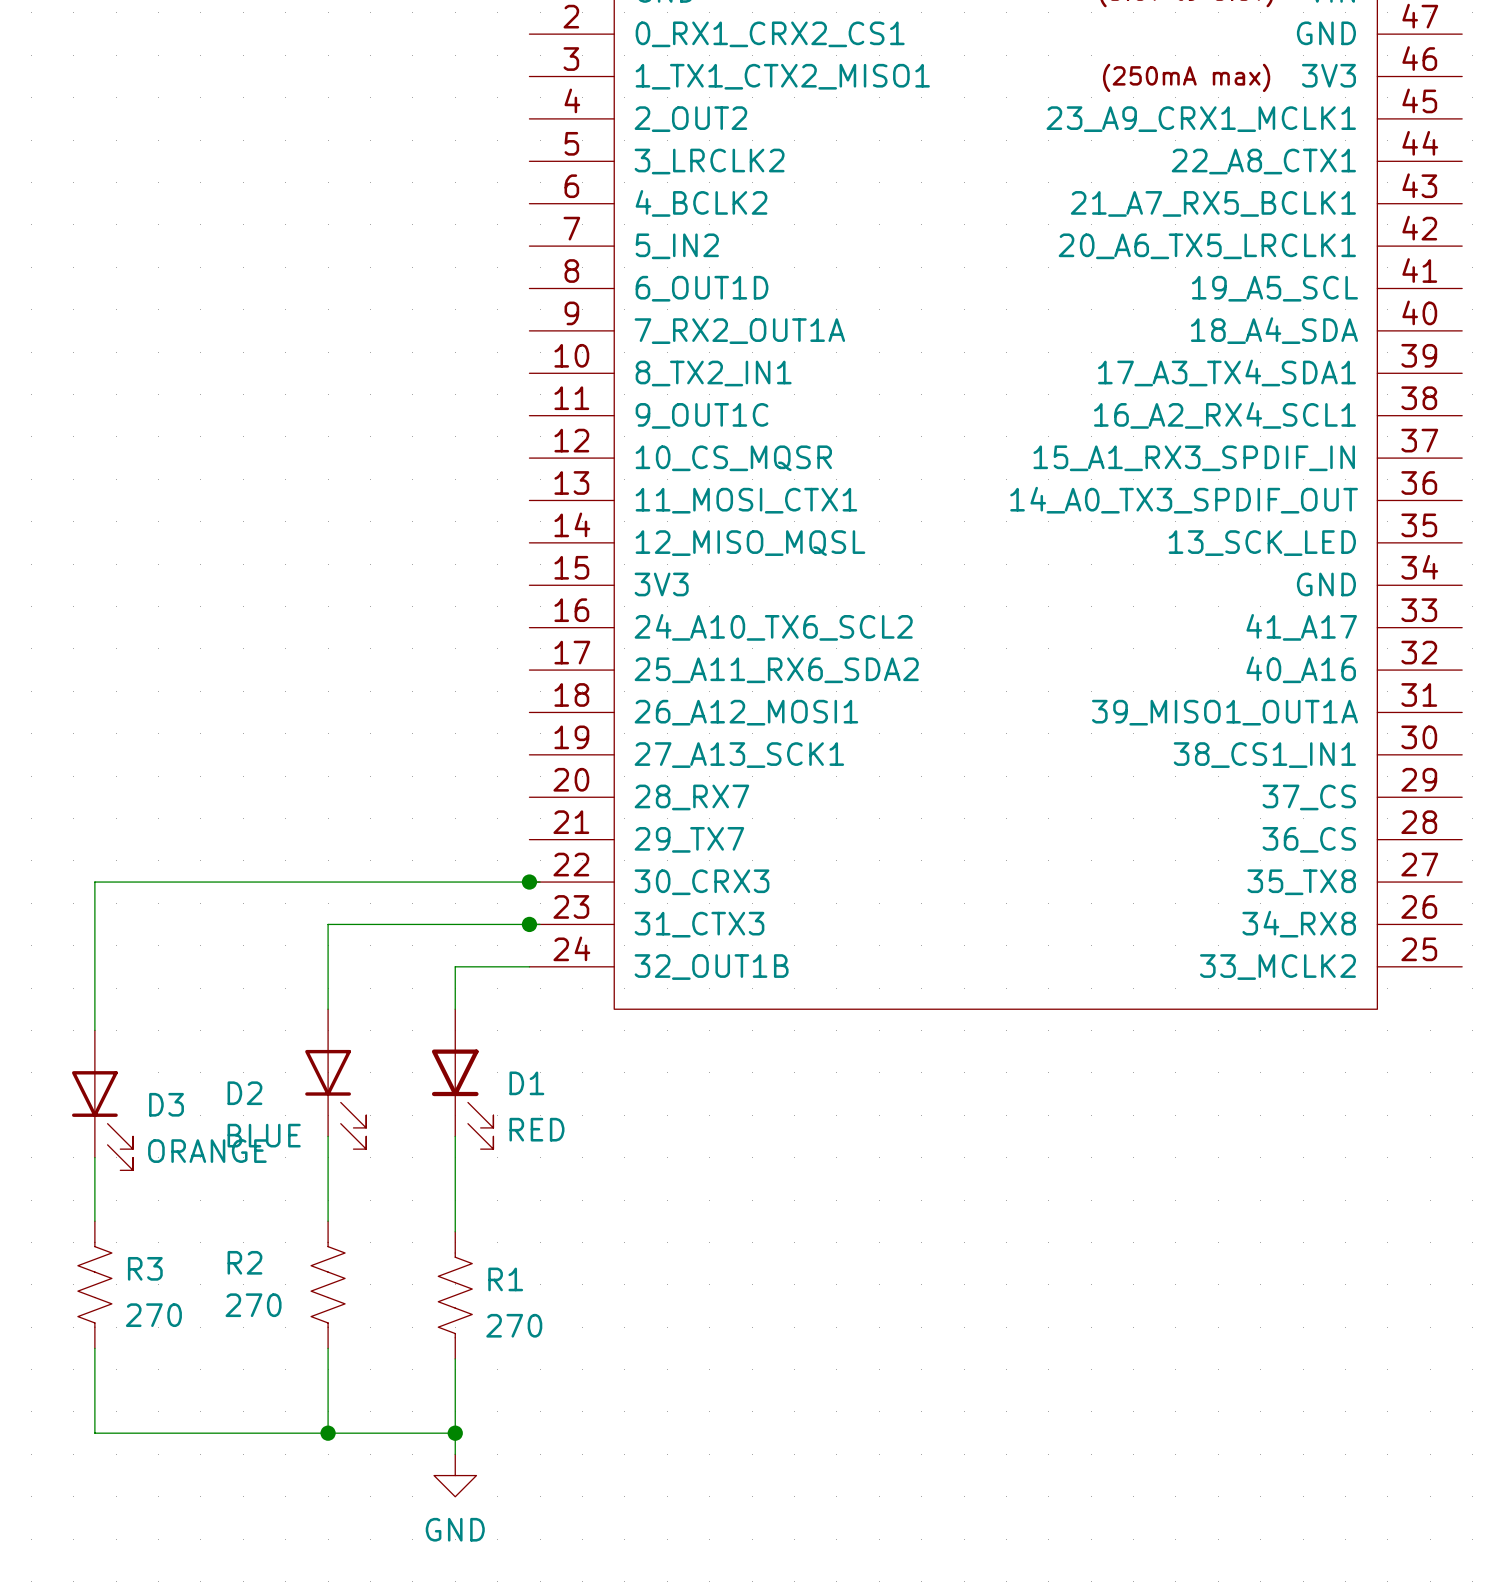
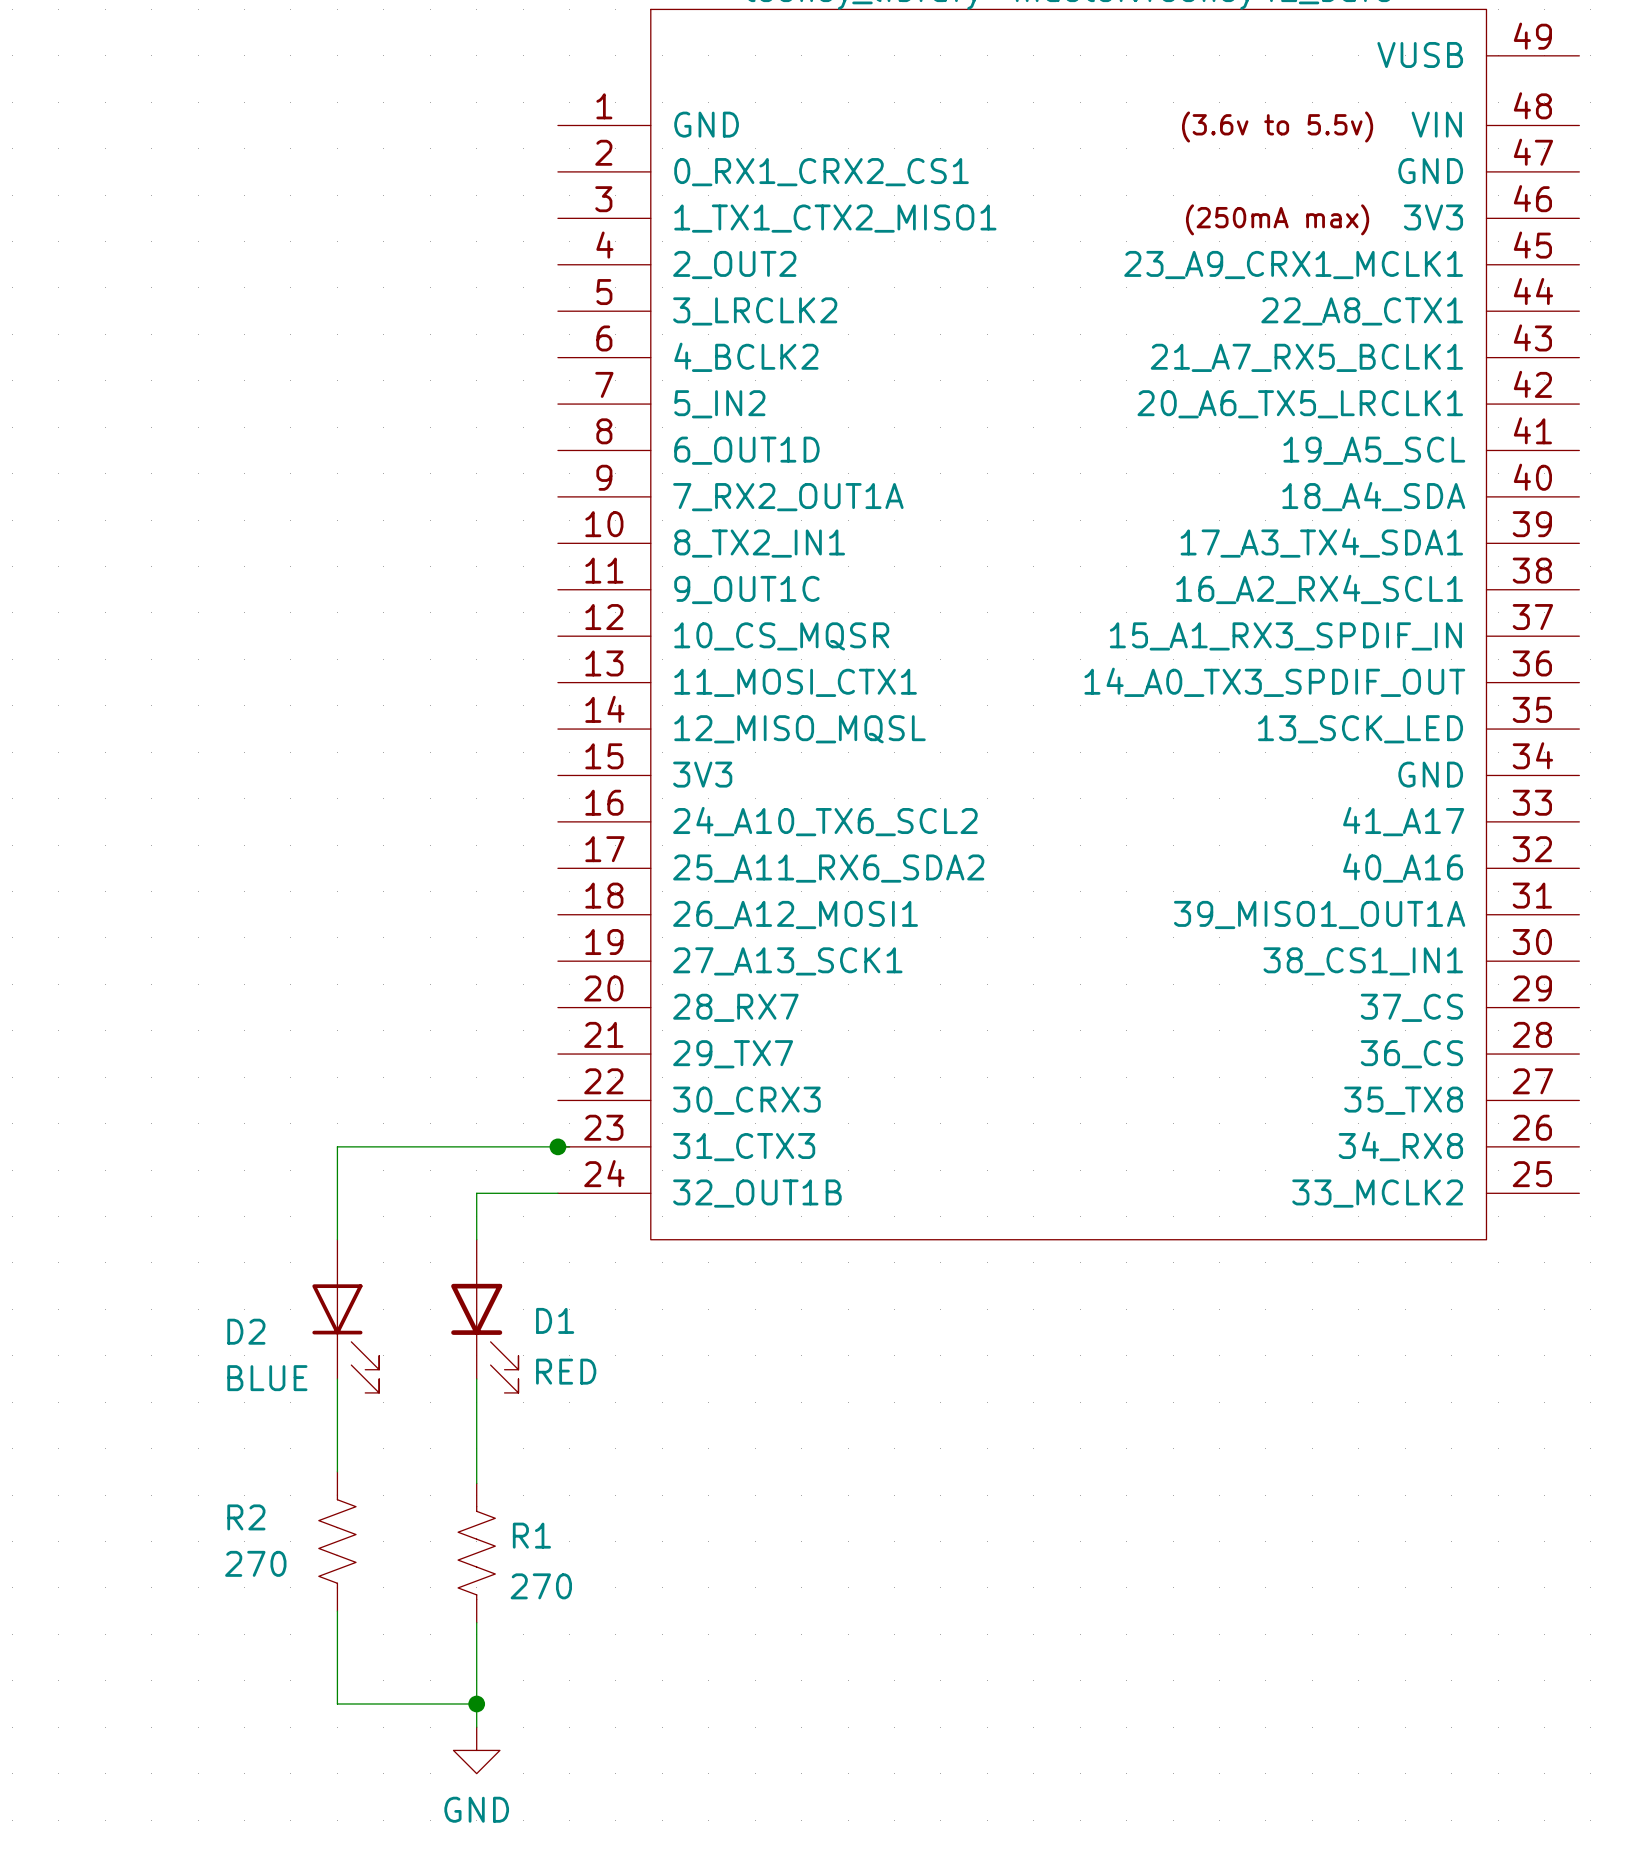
junction: (529, 882) -> none
wire: (540, 882) (94, 882) (94, 1030) -> none
D3: ORANGE (102, 1100) -> none
wire: (94, 1157) (94, 1221) -> none
R3: 270 (94, 1284) -> none
wire: (94, 1348) (94, 1433) (328, 1433) -> none
junction: (328, 1433) -> none

